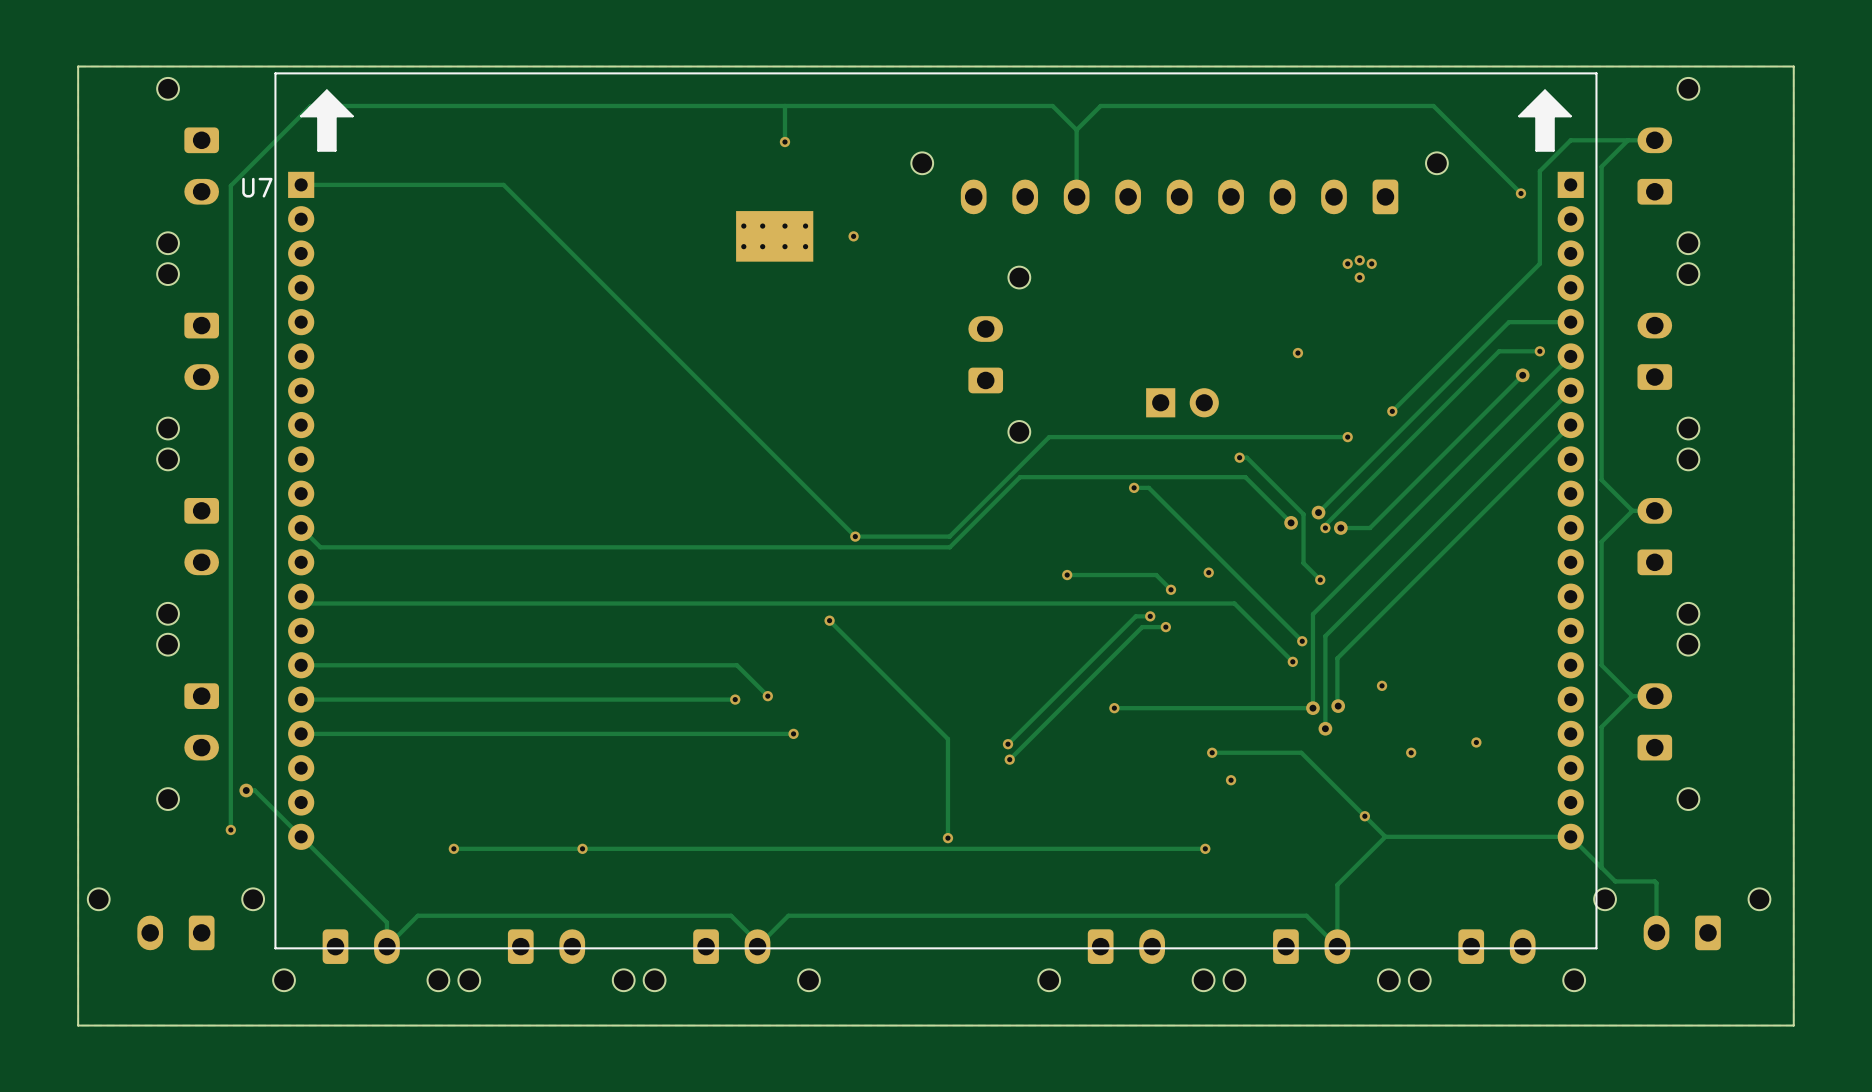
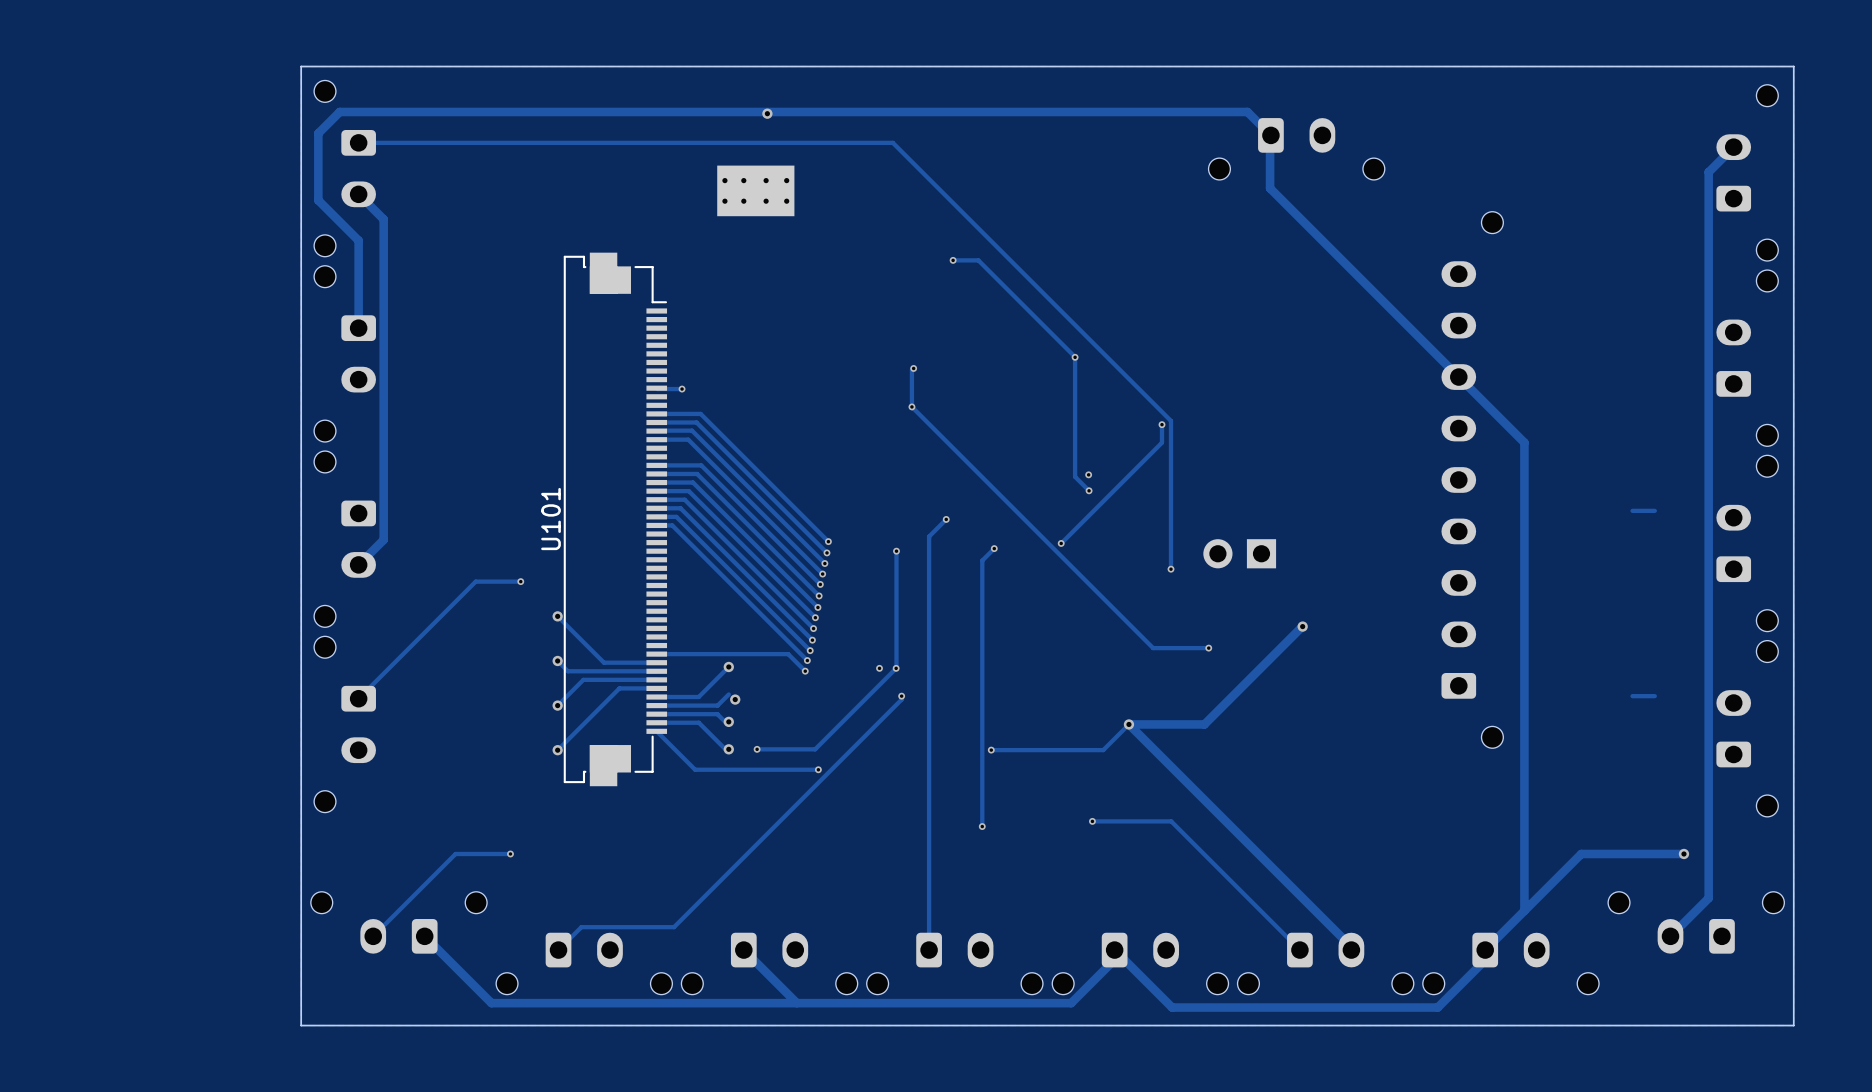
board edge: (301, 66) (78, 66) (78, 1025) (301, 1025) -> (301, 66) (301, 1025)
track: (784, 105) (784, 142) -> none
track: (1076, 129) (1052, 105) (310, 105) (230, 185) (230, 829) -> none
track: (1076, 129) (1100, 105) (1433, 105) (1520, 193) -> none
track: (1076, 129) (1076, 196) -> none
track: none -> (1270, 135) (1247, 111) (339, 111) (318, 133) (318, 200) (358, 240) (358, 328)
track: none -> (1270, 136) (1270, 188) (1524, 442) (1524, 910)
track: (1628, 140) (1601, 166) (1601, 479) (1632, 510) (1601, 541) (1601, 665) (1632, 696) (1601, 727) (1601, 867) -> none
track: (1654, 140) (1570, 140) (1539, 171) (1539, 263) (1392, 411) -> none
track: none -> (358, 142) (892, 142) (1170, 420) (1170, 569)
via position: (784, 142) -> (767, 113)
track: none -> (1733, 147) (1708, 172) (1708, 898) (1670, 936)
part: none -> (1296, 148)
part: (188, 166) -> none
part position: (1668, 166) -> (1747, 172)
part: none -> (345, 168)
part rotation: 0° (1179, 183) -> 90° clockwise (1472, 479)
part position: (1179, 183) -> (1472, 479)
track: (301, 184) (503, 184) (855, 536) (949, 536) (1049, 437) (1347, 437) -> none
via: (1520, 193) -> none
track: none -> (358, 194) (383, 219) (383, 539) (358, 564)
part position: (774, 236) -> (755, 190)
via: (853, 236) -> none
track: none -> (953, 260) (978, 260) (1075, 357) (1075, 476) (1089, 490)
via: none -> (953, 260)
via: (1359, 260) -> none
via: (1347, 263) -> none
via: (1371, 263) -> none
via: (1359, 277) -> none
track: (1570, 322) (1508, 322) (1318, 512) -> none
part: (188, 351) -> none
track: (1539, 351) (1499, 351) (1325, 525) (1325, 528) -> none
via: (1539, 351) -> none
part position: (1668, 351) -> (1747, 358)
part: none -> (345, 353)
via: (1297, 353) -> none
part: (999, 354) -> none
track: (1570, 356) (1312, 614) (1312, 708) (1114, 708) -> none
via: none -> (1075, 357)
track: none -> (913, 368) (911, 370) (911, 406) (1153, 648) (1208, 648)
via: none -> (913, 368)
track: (1522, 375) (1370, 528) (1340, 528) -> none
via: (1522, 375) -> none
track: none -> (656, 388) (682, 389)
via: none -> (682, 389)
track: (1570, 390) (1325, 636) (1325, 728) -> none
part rotation: 0° (1182, 402) -> 180° (1239, 553)
part position: (1182, 402) -> (1239, 553)
via: none -> (911, 406)
via: (1392, 411) -> none
track: none -> (656, 413) (700, 413) (828, 541)
track: none -> (656, 422) (696, 422) (826, 552)
track: none -> (1161, 424) (1161, 442) (1061, 543)
via: none -> (1161, 424)
track: (1570, 425) (1337, 658) (1338, 706) -> none
track: none -> (667, 430) (692, 430) (824, 563)
via: (1347, 437) -> none
track: none -> (656, 439) (688, 439) (822, 574)
track: (1239, 457) (1246, 457) (1303, 514) (1303, 563) (1320, 579) -> none
via: (1239, 457) -> none
track: none -> (656, 465) (701, 465) (820, 584)
track: none -> (656, 473) (697, 473) (819, 595)
via: none -> (1088, 474)
track: none -> (656, 482) (693, 482) (817, 607)
track: (1134, 487) (1148, 487) (1302, 641) -> none
via: (1134, 487) -> none
via: none -> (1089, 490)
track: none -> (656, 491) (688, 491) (815, 617)
track: none -> (656, 499) (684, 499) (813, 628)
track: none -> (656, 508) (680, 508) (812, 640)
U7: (935, 510) -> none
via: (1318, 512) -> none
track: none -> (656, 516) (676, 516) (810, 650)
U101: none -> (615, 519)
track: none -> (946, 519) (929, 536) (929, 950)
via: none -> (946, 519)
track: (1291, 522) (1245, 477) (1020, 477) (949, 547) (320, 547) (301, 528) -> none
via: (1291, 522) -> none
track: none -> (656, 525) (672, 525) (807, 660)
via: (1325, 528) -> none
via: (1340, 528) -> none
part: (188, 536) -> none
via: (855, 536) -> none
part position: (1668, 536) -> (1747, 543)
part: none -> (345, 539)
via: none -> (828, 541)
via: none -> (1061, 543)
track: none -> (994, 548) (982, 560) (982, 826)
via: none -> (994, 548)
track: none -> (896, 551) (896, 668) (815, 749) (757, 749)
via: none -> (896, 551)
via: none -> (826, 552)
via: none -> (824, 563)
via: none -> (1170, 569)
via: (1208, 572) -> none
via: none -> (822, 574)
track: (1067, 575) (1156, 575) (1170, 589) -> none
via: (1067, 575) -> none
via: (1320, 579) -> none
track: none -> (520, 581) (475, 581) (358, 698)
via: none -> (520, 581)
via: none -> (820, 584)
via: (1170, 589) -> none
via: none -> (819, 595)
track: (301, 596) (308, 603) (1234, 603) (1292, 661) -> none
via: none -> (817, 607)
track: none -> (557, 616) (603, 662) (656, 662)
via: none -> (557, 616)
track: (1150, 616) (1135, 616) (1008, 744) -> none
via: (1150, 616) -> none
via: none -> (815, 617)
track: (829, 620) (947, 739) (947, 838) -> none
via: (829, 620) -> none
track: none -> (1302, 626) (1204, 724) (1128, 724)
track: (1165, 627) (1142, 627) (1009, 759) -> none
via: (1165, 627) -> none
via: none -> (813, 628)
via: none -> (812, 640)
via position: (1302, 641) -> (1302, 626)
via: none -> (1208, 648)
via: none -> (810, 650)
track: none -> (656, 654) (788, 654) (805, 671)
track: none -> (557, 660) (567, 671) (656, 671)
via: none -> (557, 660)
via: none -> (807, 660)
via: (1292, 661) -> none
track: (301, 665) (736, 665) (767, 696) -> none
track: none -> (728, 666) (698, 697) (656, 697)
via: none -> (728, 666)
via: none -> (879, 668)
via: none -> (896, 668)
via: none -> (805, 671)
track: none -> (656, 679) (583, 679) (557, 705)
via: (1382, 685) -> none
track: none -> (656, 688) (619, 688) (557, 750)
track: none -> (728, 694) (717, 705) (656, 705)
via: (767, 696) -> none
track: none -> (901, 696) (901, 699) (674, 927) (581, 927) (558, 950)
via: none -> (901, 696)
track: (301, 699) (735, 699) -> none
via: none -> (557, 705)
via: (1338, 706) -> none
via position: (1114, 708) -> (1128, 724)
via: (1312, 708) -> none
track: none -> (656, 714) (717, 714) (725, 721) (728, 721)
part: (188, 721) -> none
via: none -> (728, 721)
part position: (1668, 721) -> (1747, 728)
track: none -> (656, 722) (698, 722) (725, 749) (728, 749)
part: none -> (345, 724)
track: none -> (1128, 724) (1103, 750) (991, 750)
track: none -> (1128, 724) (1351, 946)
via: (1325, 728) -> none
track: none -> (656, 731) (695, 769) (818, 769)
track: (301, 733) (793, 733) -> none
via: (793, 733) -> none
via: (1476, 742) -> none
via: (1008, 744) -> none
via: none -> (728, 749)
via: none -> (757, 749)
via: none -> (557, 750)
via: none -> (991, 750)
track: (1212, 752) (1301, 752) (1385, 836) -> none
via: (1212, 752) -> none
via: (1411, 752) -> none
via: (1009, 759) -> none
via: none -> (818, 769)
via: (1231, 780) -> none
track: (246, 790) (254, 790) (386, 922) (386, 946) (417, 915) (731, 915) (757, 942) (757, 946) (788, 915) (1306, 915) (1337, 946) (1337, 884) (1385, 836) -> none
via: (246, 790) -> none
via: (1364, 816) -> none
track: none -> (1092, 821) (1171, 821) (1299, 950)
via: none -> (1092, 821)
via: none -> (982, 826)
via: (230, 829) -> none
track: (1385, 836) (1570, 836) (1615, 881) (1654, 881) (1656, 883) (1656, 932) -> none
via: (947, 838) -> none
track: (453, 848) (1205, 848) -> none
via: (453, 848) -> none
via: (582, 848) -> none
via: (1205, 848) -> none
track: none -> (510, 853) (455, 853) (373, 936)
via: none -> (510, 853)
track: none -> (1683, 853) (1581, 853) (1485, 950)
via: none -> (1683, 853)
part: (175, 919) -> none
part position: (1682, 919) -> (1696, 922)
track: none -> (424, 936) (491, 1003) (1071, 1003) (1114, 959)
track: none -> (743, 950) (796, 1003)
track: none -> (1114, 950) (1172, 1007) (1437, 1007) (1485, 960)
part rotation: 0° (361, 960) -> 180° (398, 922)
part position: (546, 960) -> (584, 963)
part position: (731, 960) -> (769, 963)
part position: (1126, 960) -> (1140, 963)
part position: (1311, 960) -> (1325, 963)
part position: (1496, 960) -> (1510, 963)
part: none -> (954, 963)

